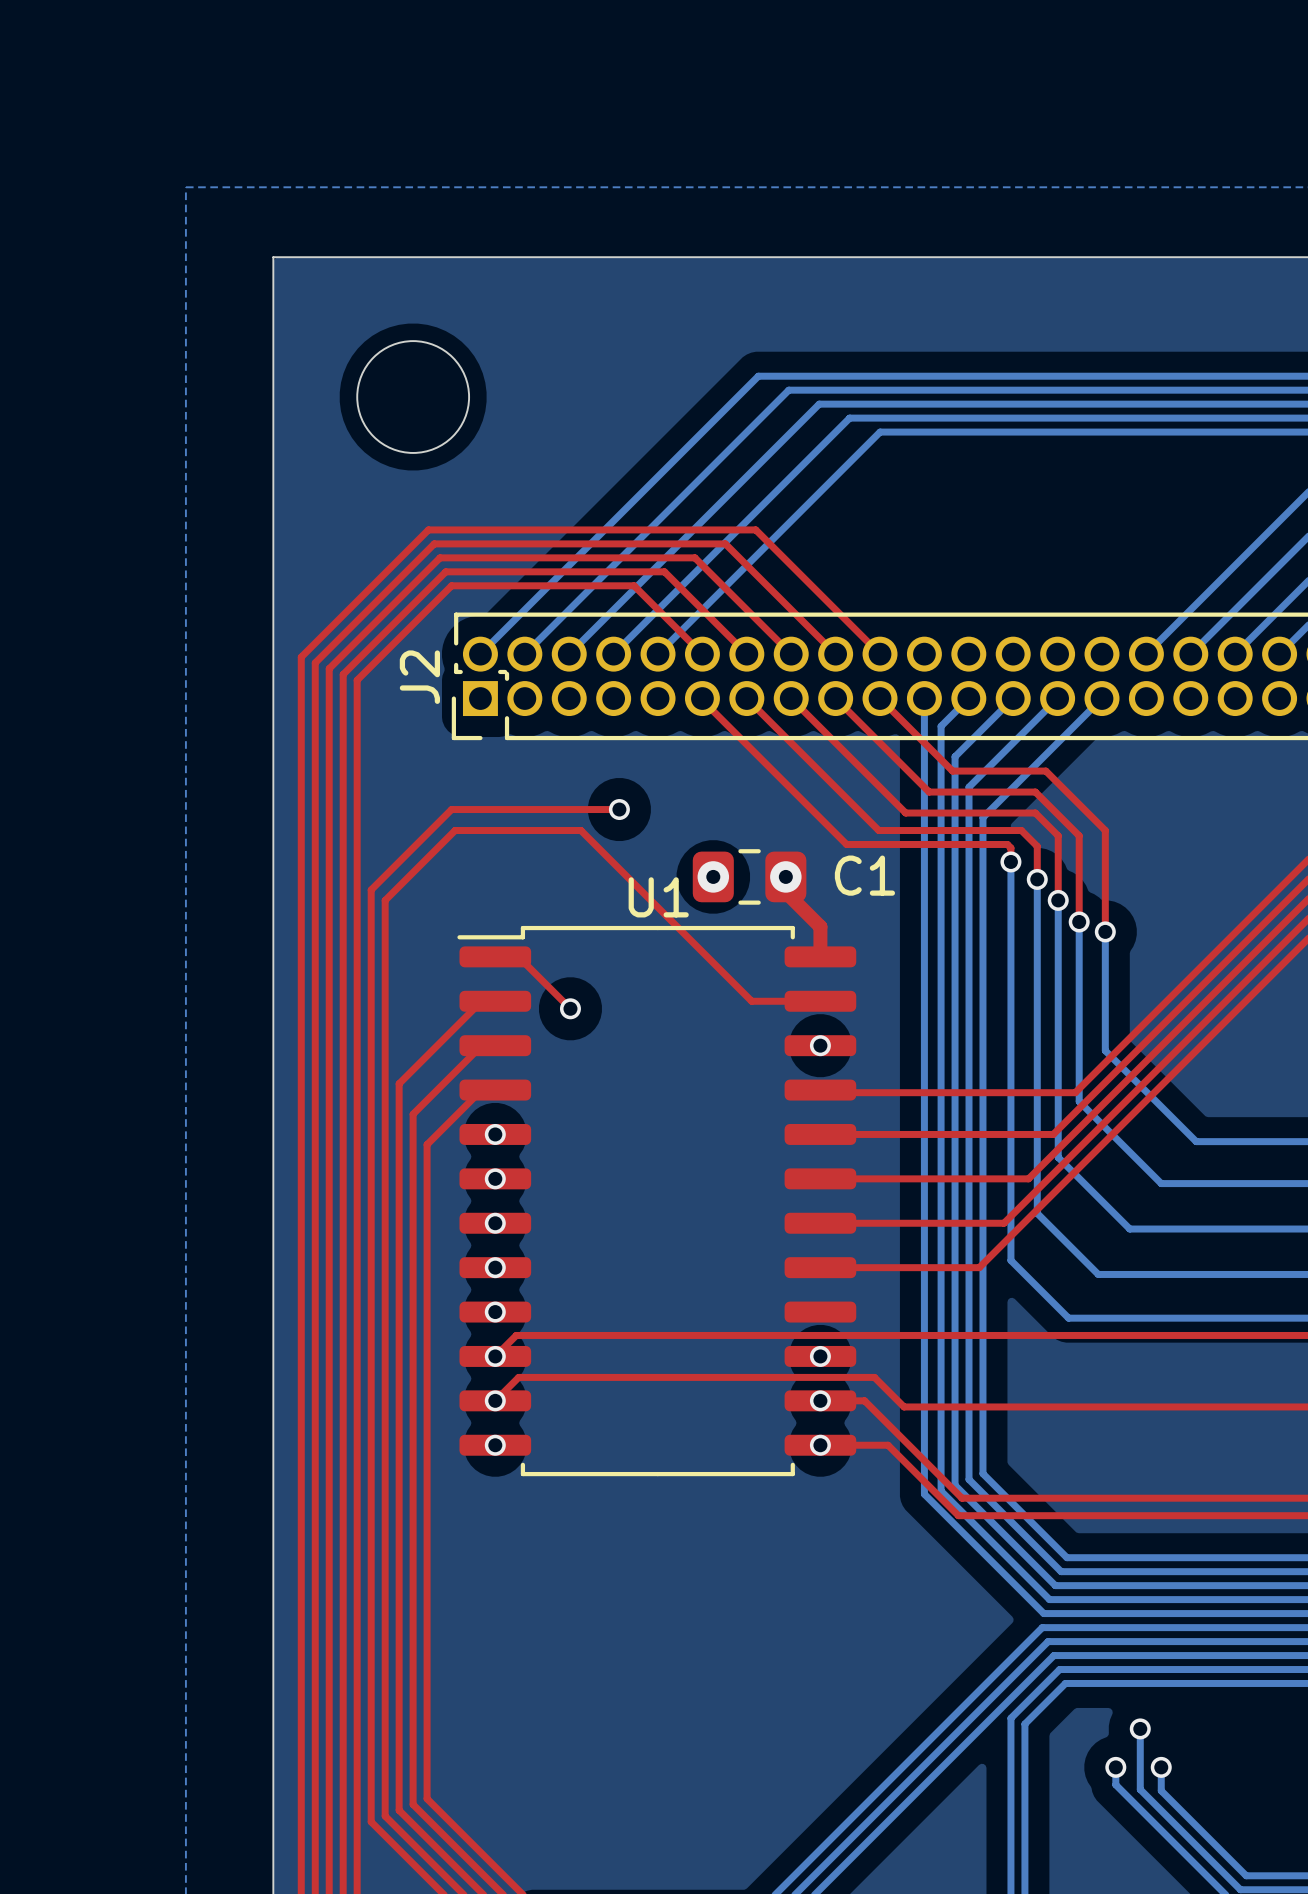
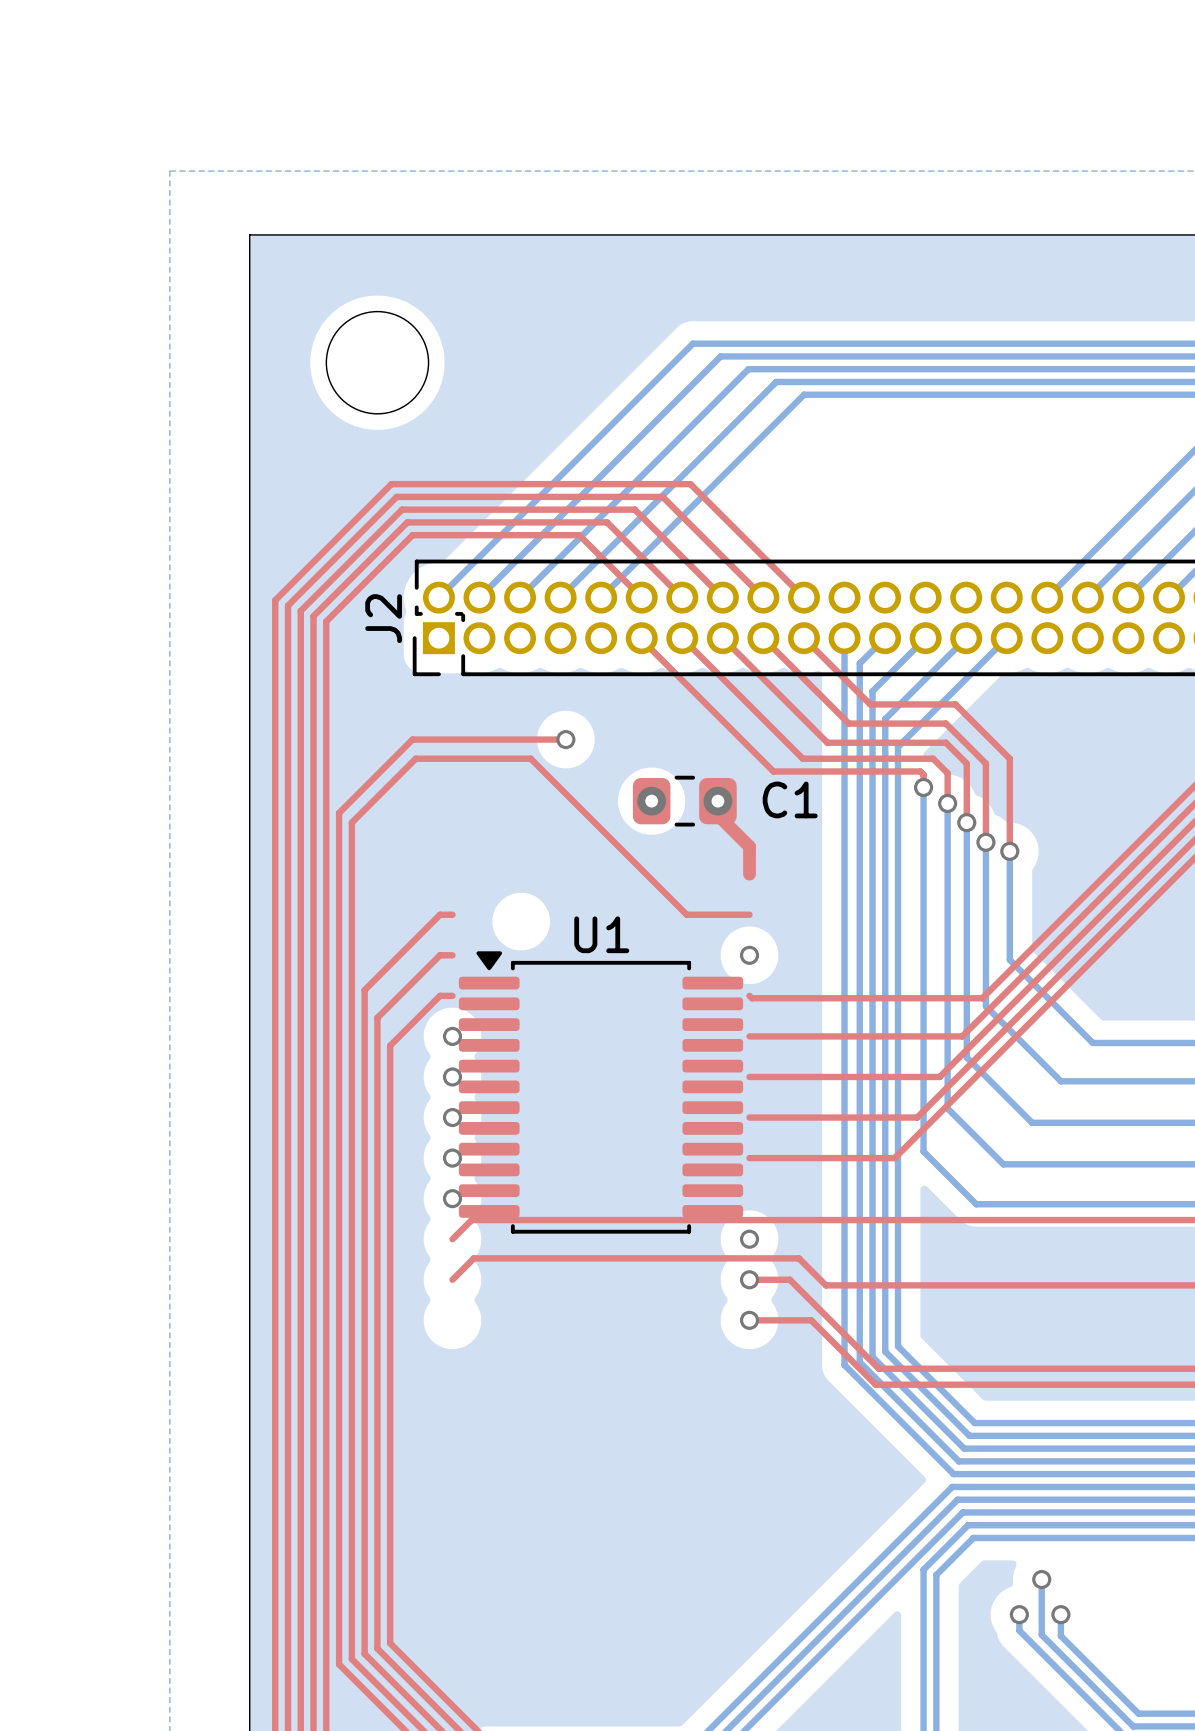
U1 name position: U1 (658, 897) -> U1 (601, 934)
U1 footprint: [457, 925, 857, 1477] -> [458, 951, 744, 1234]
top track: (495, 956) (518, 956) (570, 1008) -> none
via: (570, 1008) -> none
via: (495, 1356) -> none
via: (495, 1400) -> none
via: (495, 1445) -> none

